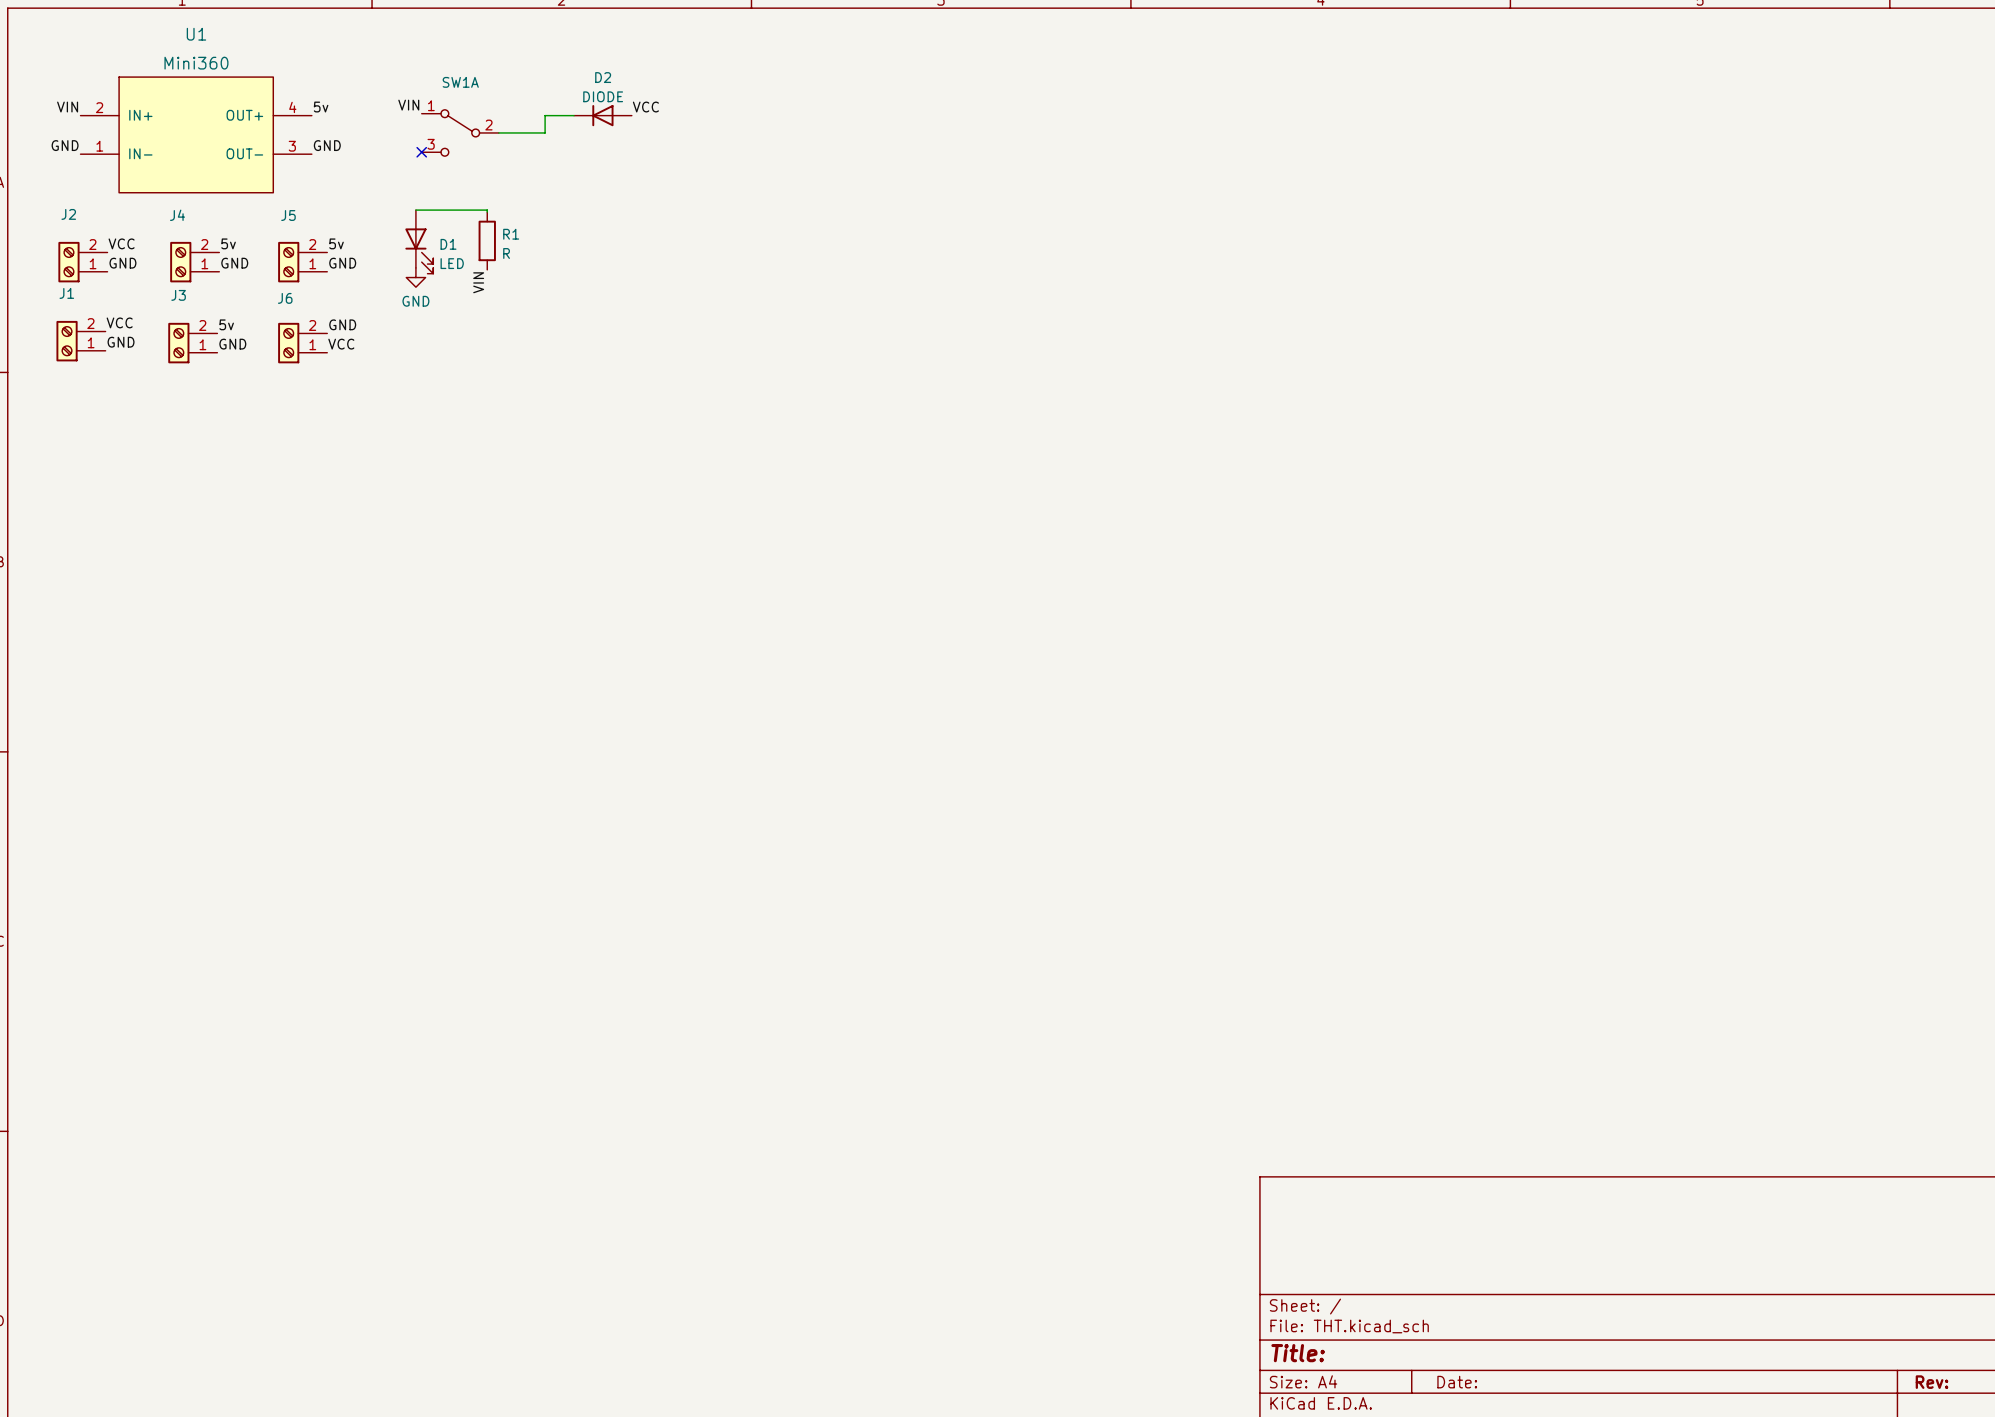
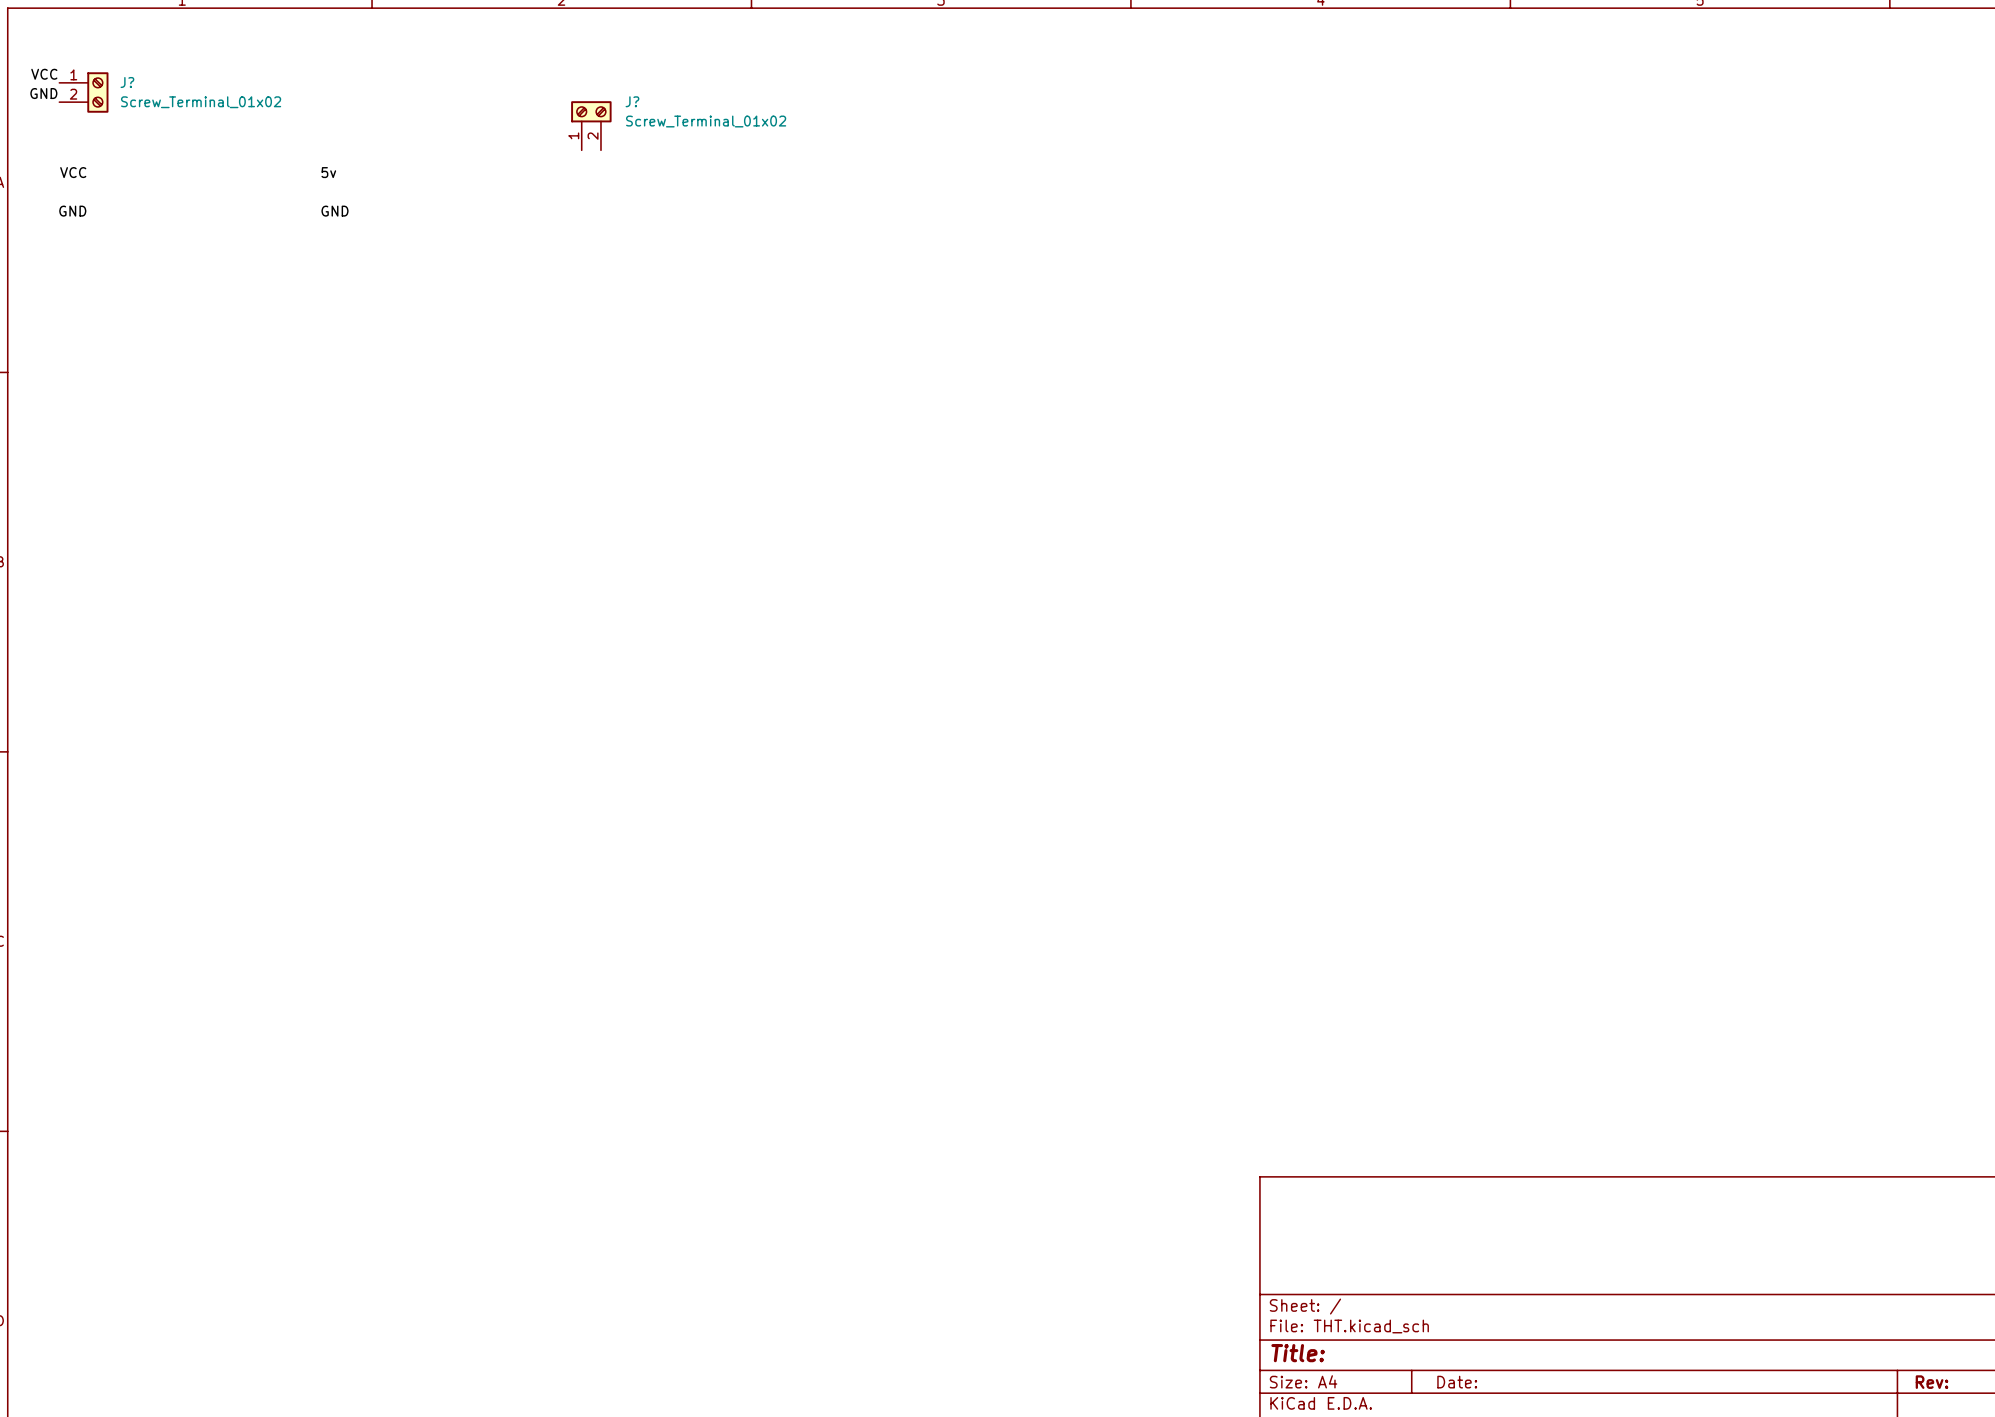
label: none -> VCC (44, 74)
J?: none -> Screw_Terminal_01x02 (83, 92)
label: none -> GND (43, 93)
label: VIN (408, 105) -> none
label: VIN (67, 107) -> none
label: 5v (321, 107) -> none
label: VCC (645, 107) -> none
wire: (574, 115) (545, 115) (545, 132) (498, 132) -> none
D2: DIODE (602, 115) -> none
J?: none -> Screw_Terminal_01x02 (591, 125)
SW1A: (460, 132) -> none
U1: Mini360 (196, 134) -> none
label: GND (65, 145) -> none
label: GND (327, 145) -> none
no-connect mark: (421, 152) -> none
label: none -> 5v (328, 172)
wire: (415, 210) (487, 210) (487, 212) -> none
label: none -> GND (72, 211)
label: none -> GND (335, 211)
R1: R (487, 240) -> none
D1: LED (419, 241) -> none
label position: VCC (121, 243) -> VCC (73, 172)
label: 5v (228, 243) -> none
label: 5v (336, 243) -> none
J2: (82, 262) -> none
J4: (194, 262) -> none
J5: (302, 262) -> none
label: GND (122, 263) -> none
label: GND (234, 263) -> none
label: GND (342, 263) -> none
power symbol: GND (415, 277) -> none
label: VIN (478, 282) -> none
label: VCC (119, 322) -> none
label: 5v (226, 324) -> none
label: GND (342, 324) -> none
J1: (81, 341) -> none
label: GND (121, 342) -> none
J3: (192, 343) -> none
J6: (302, 343) -> none
label: GND (232, 344) -> none
label: VCC (341, 344) -> none

